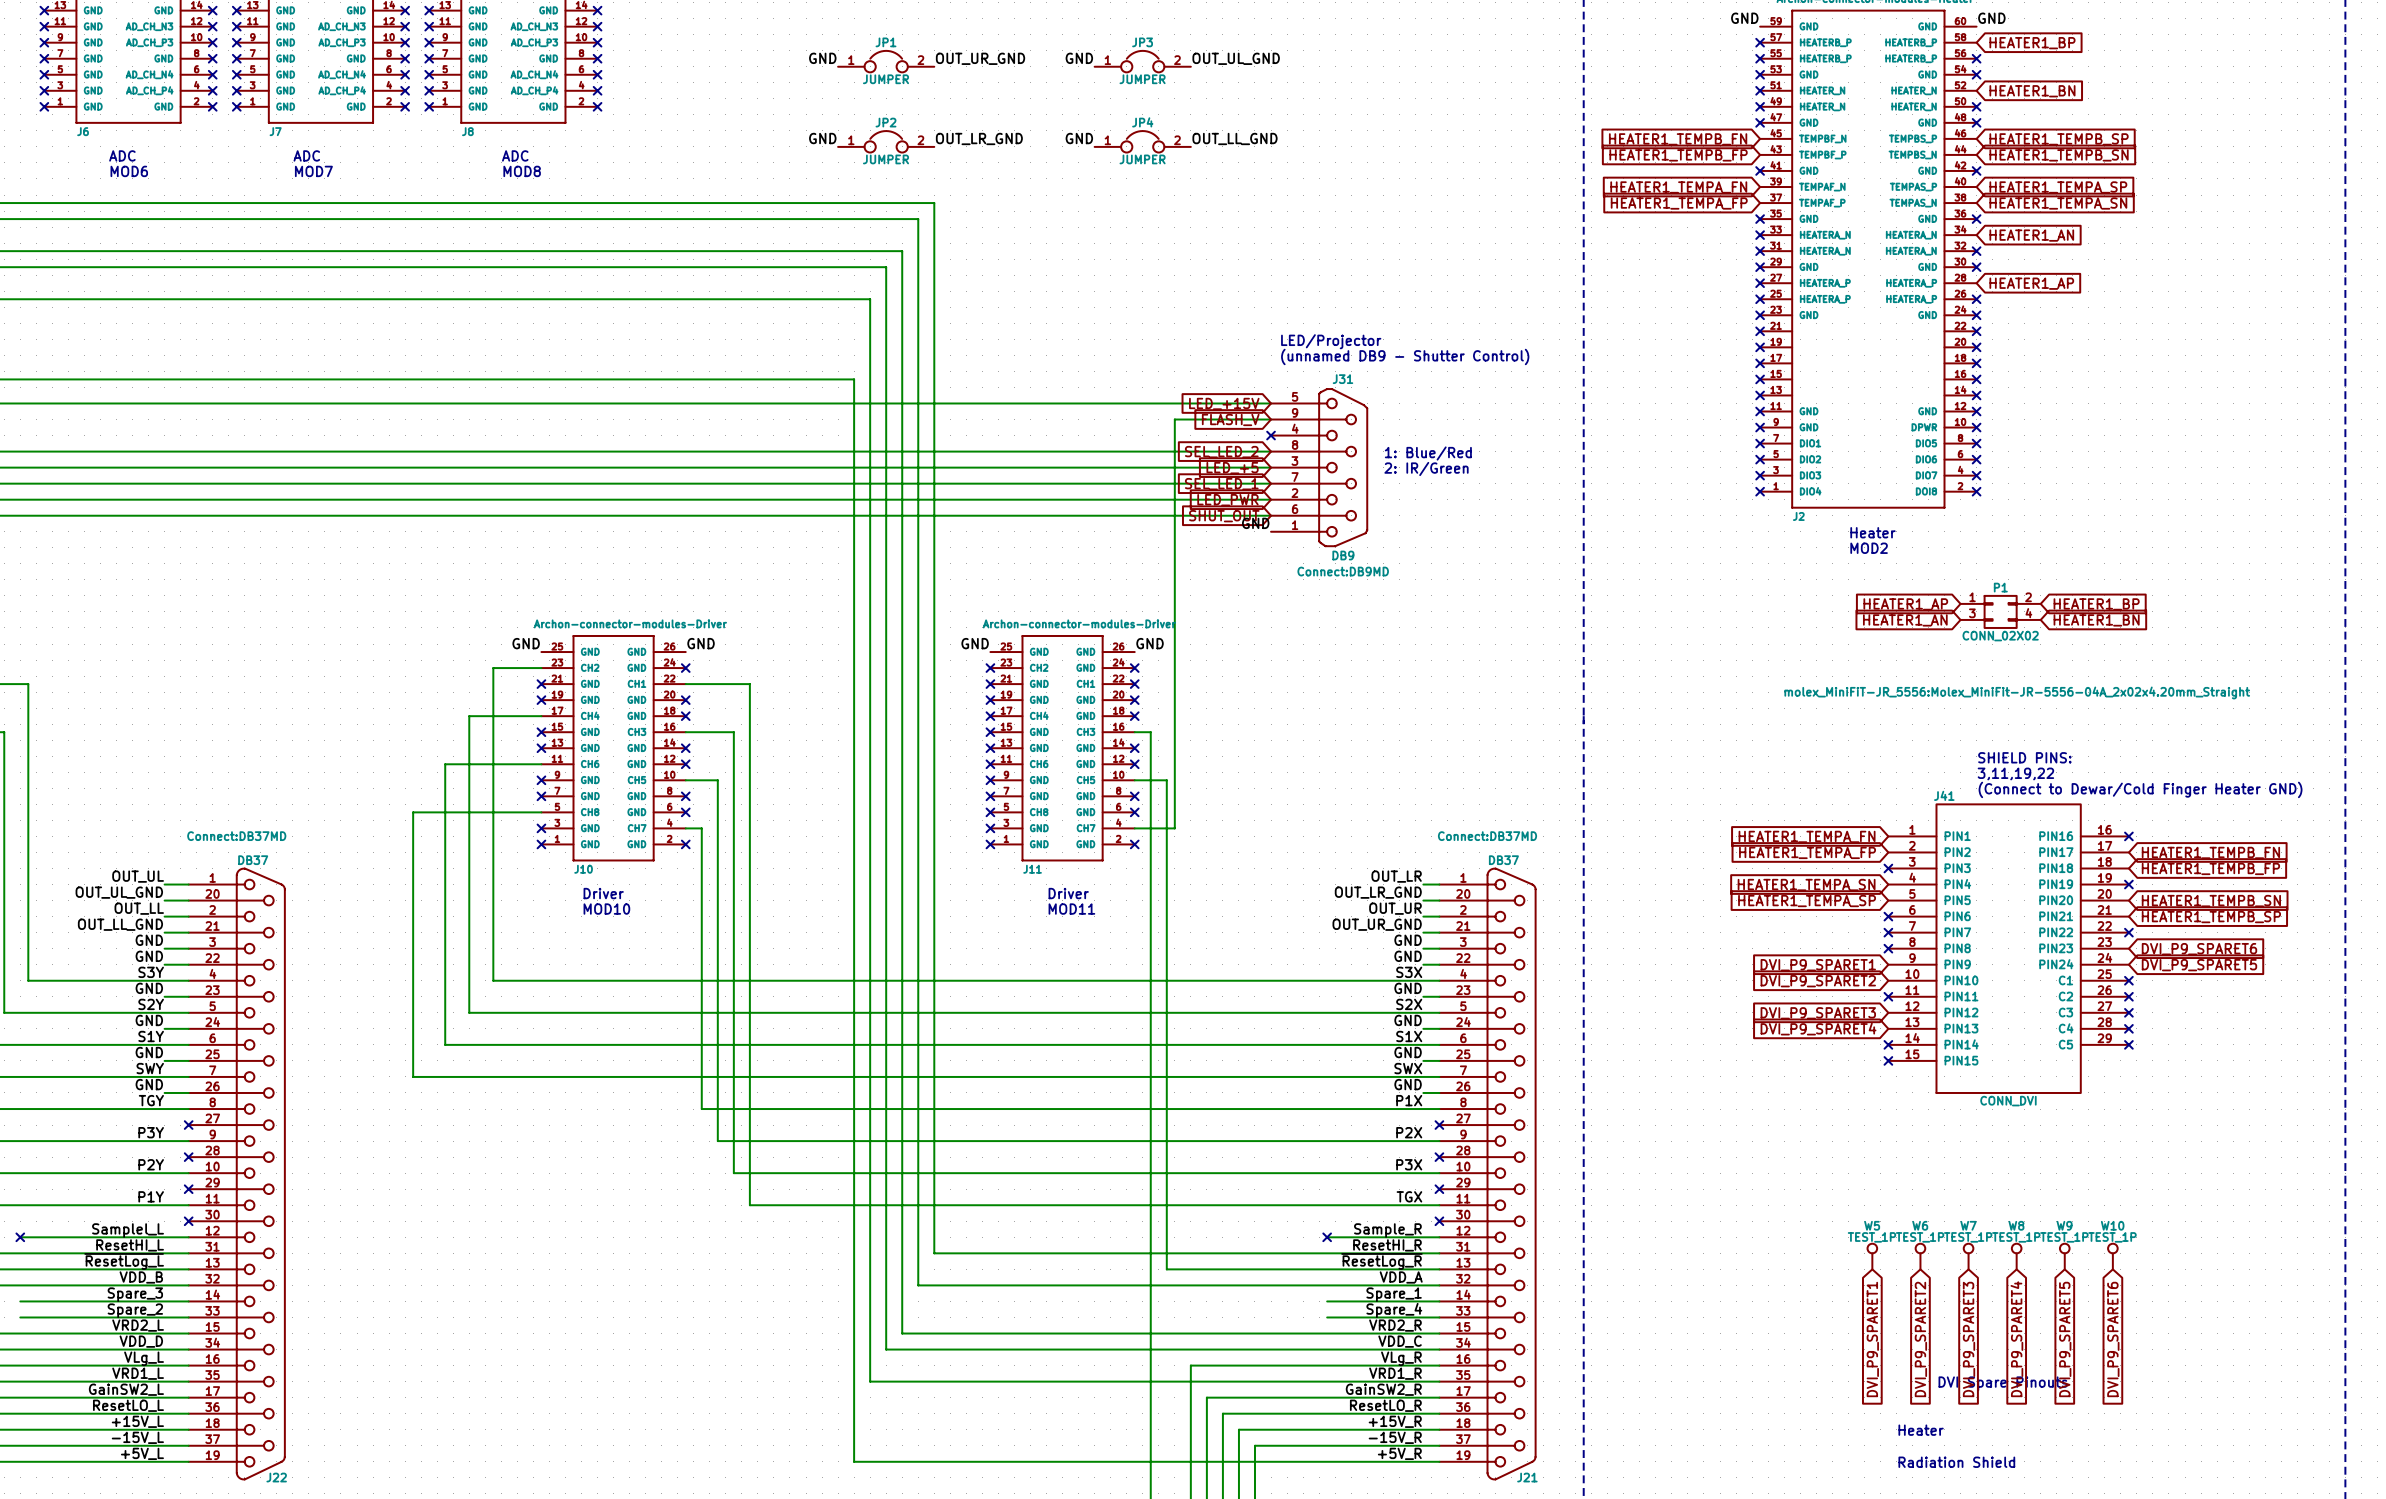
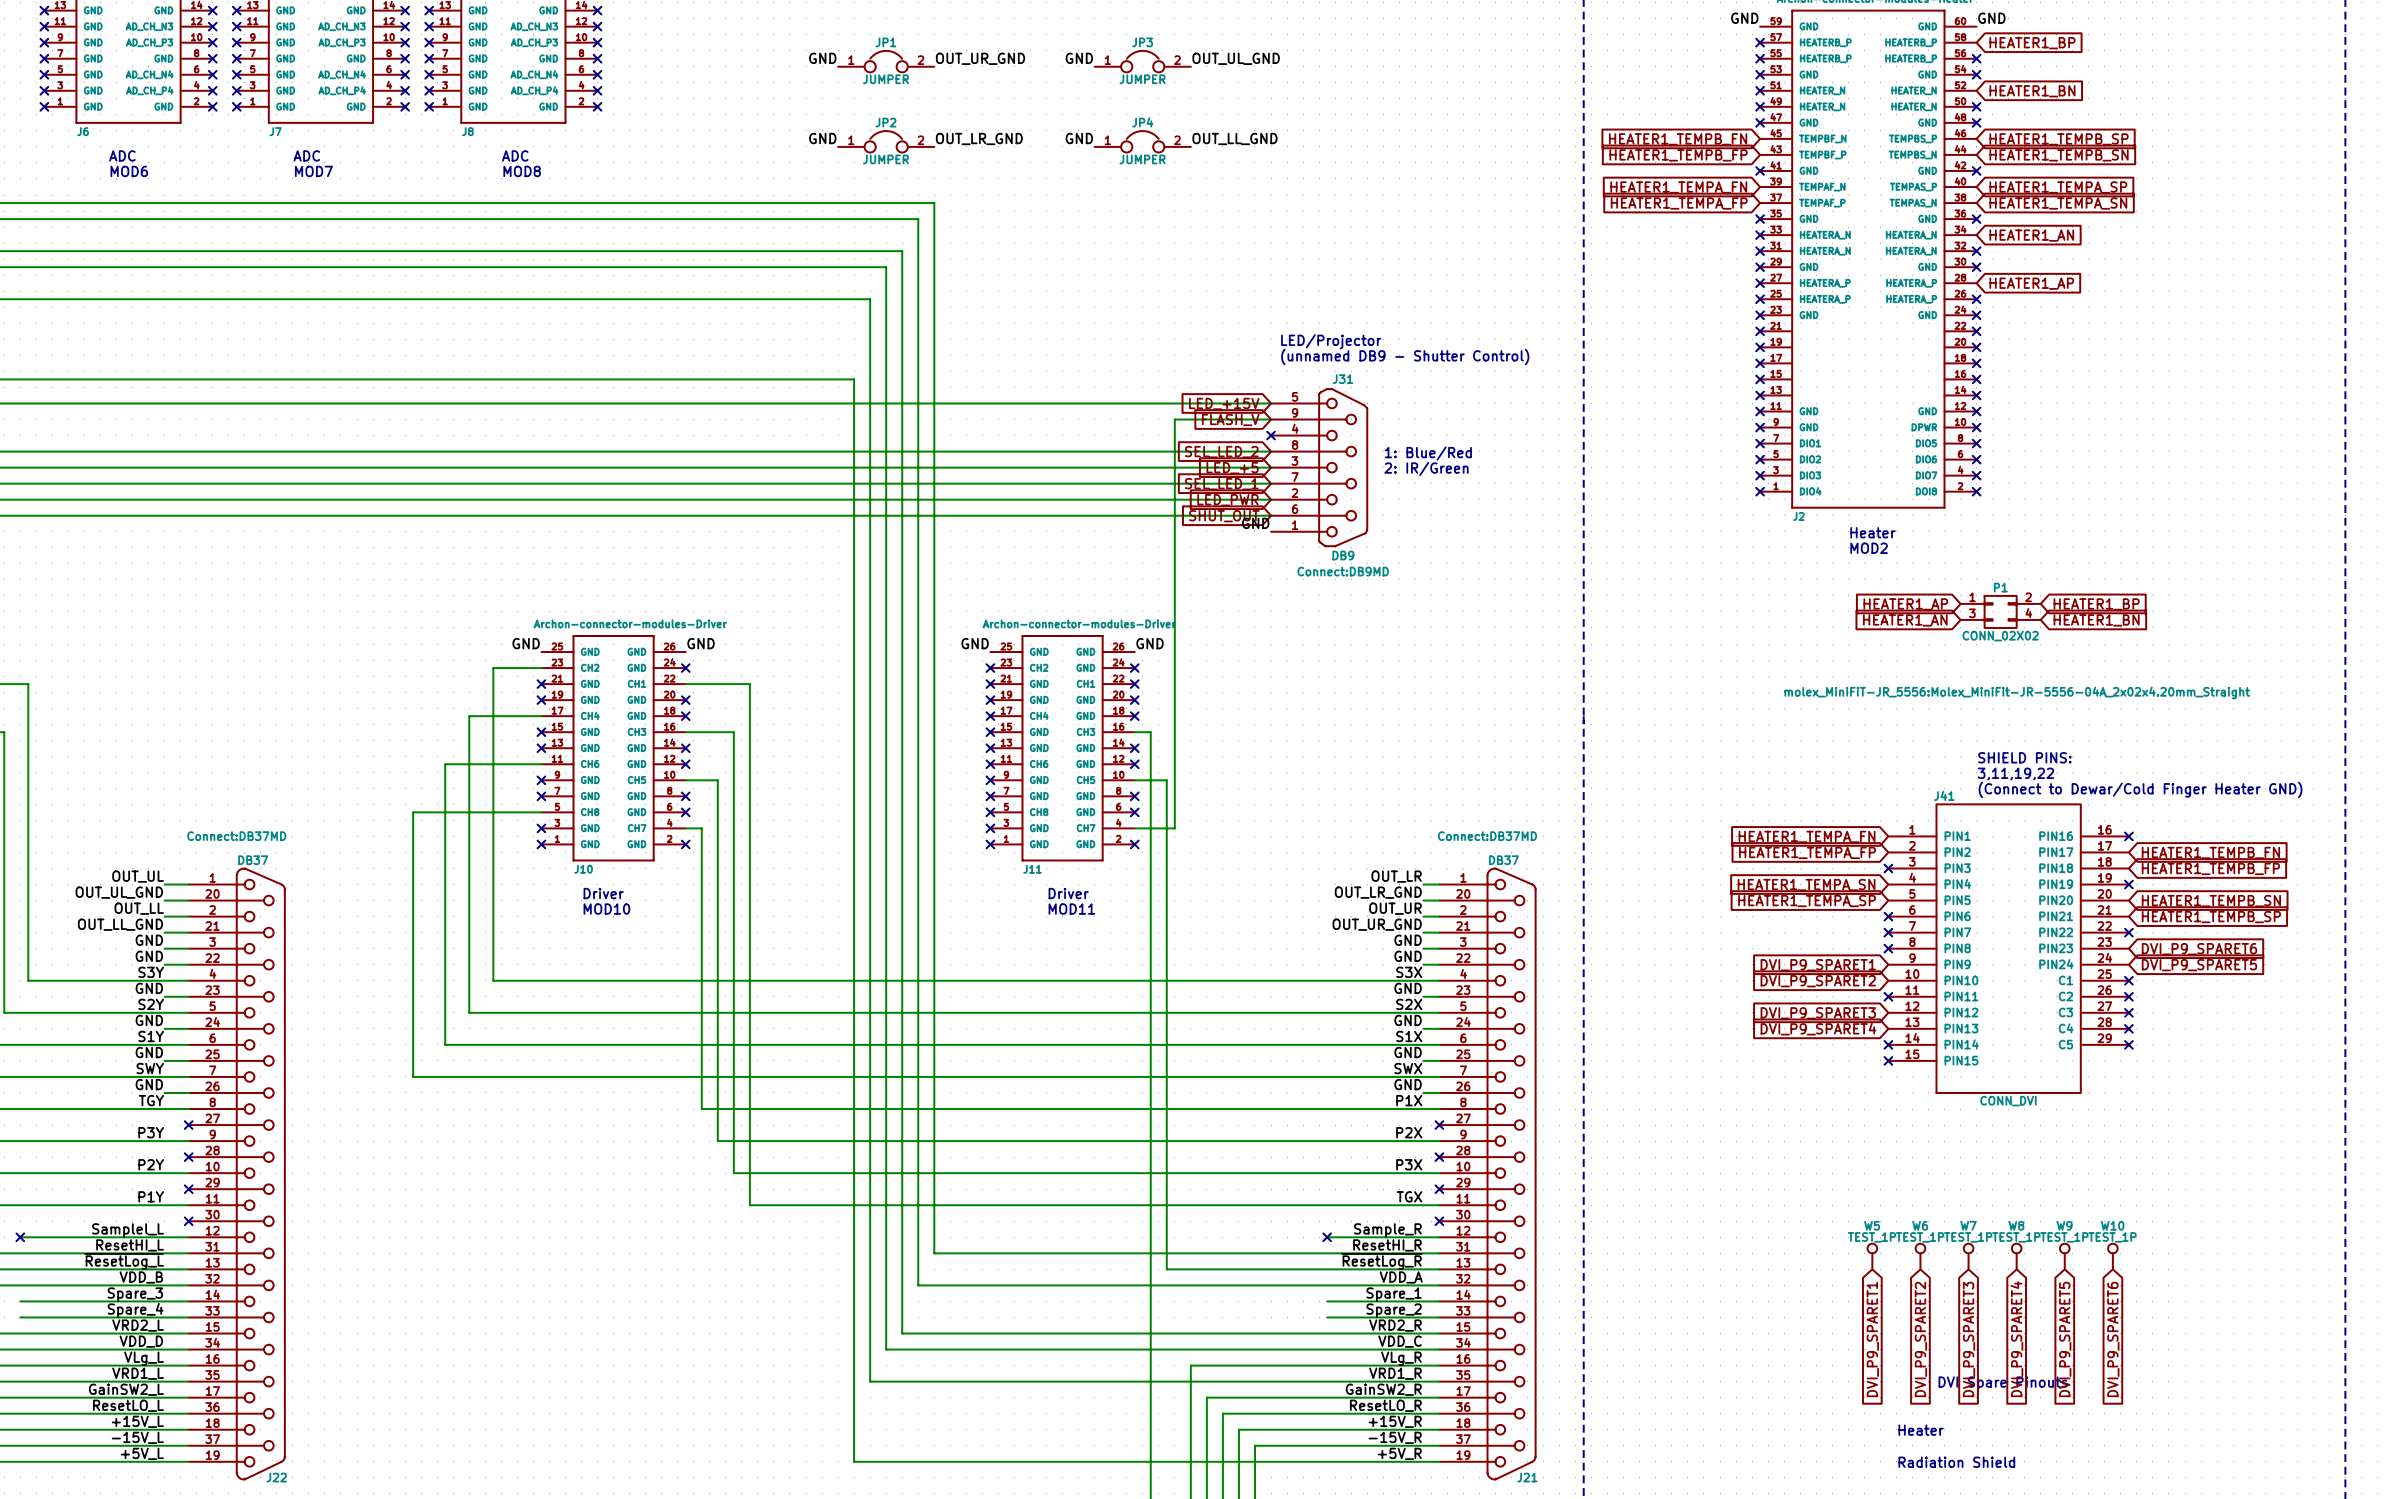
label: Spare_2 (135, 1310) -> Spare_4 (135, 1310)
label: Spare_4 (1394, 1310) -> Spare_2 (1394, 1310)

